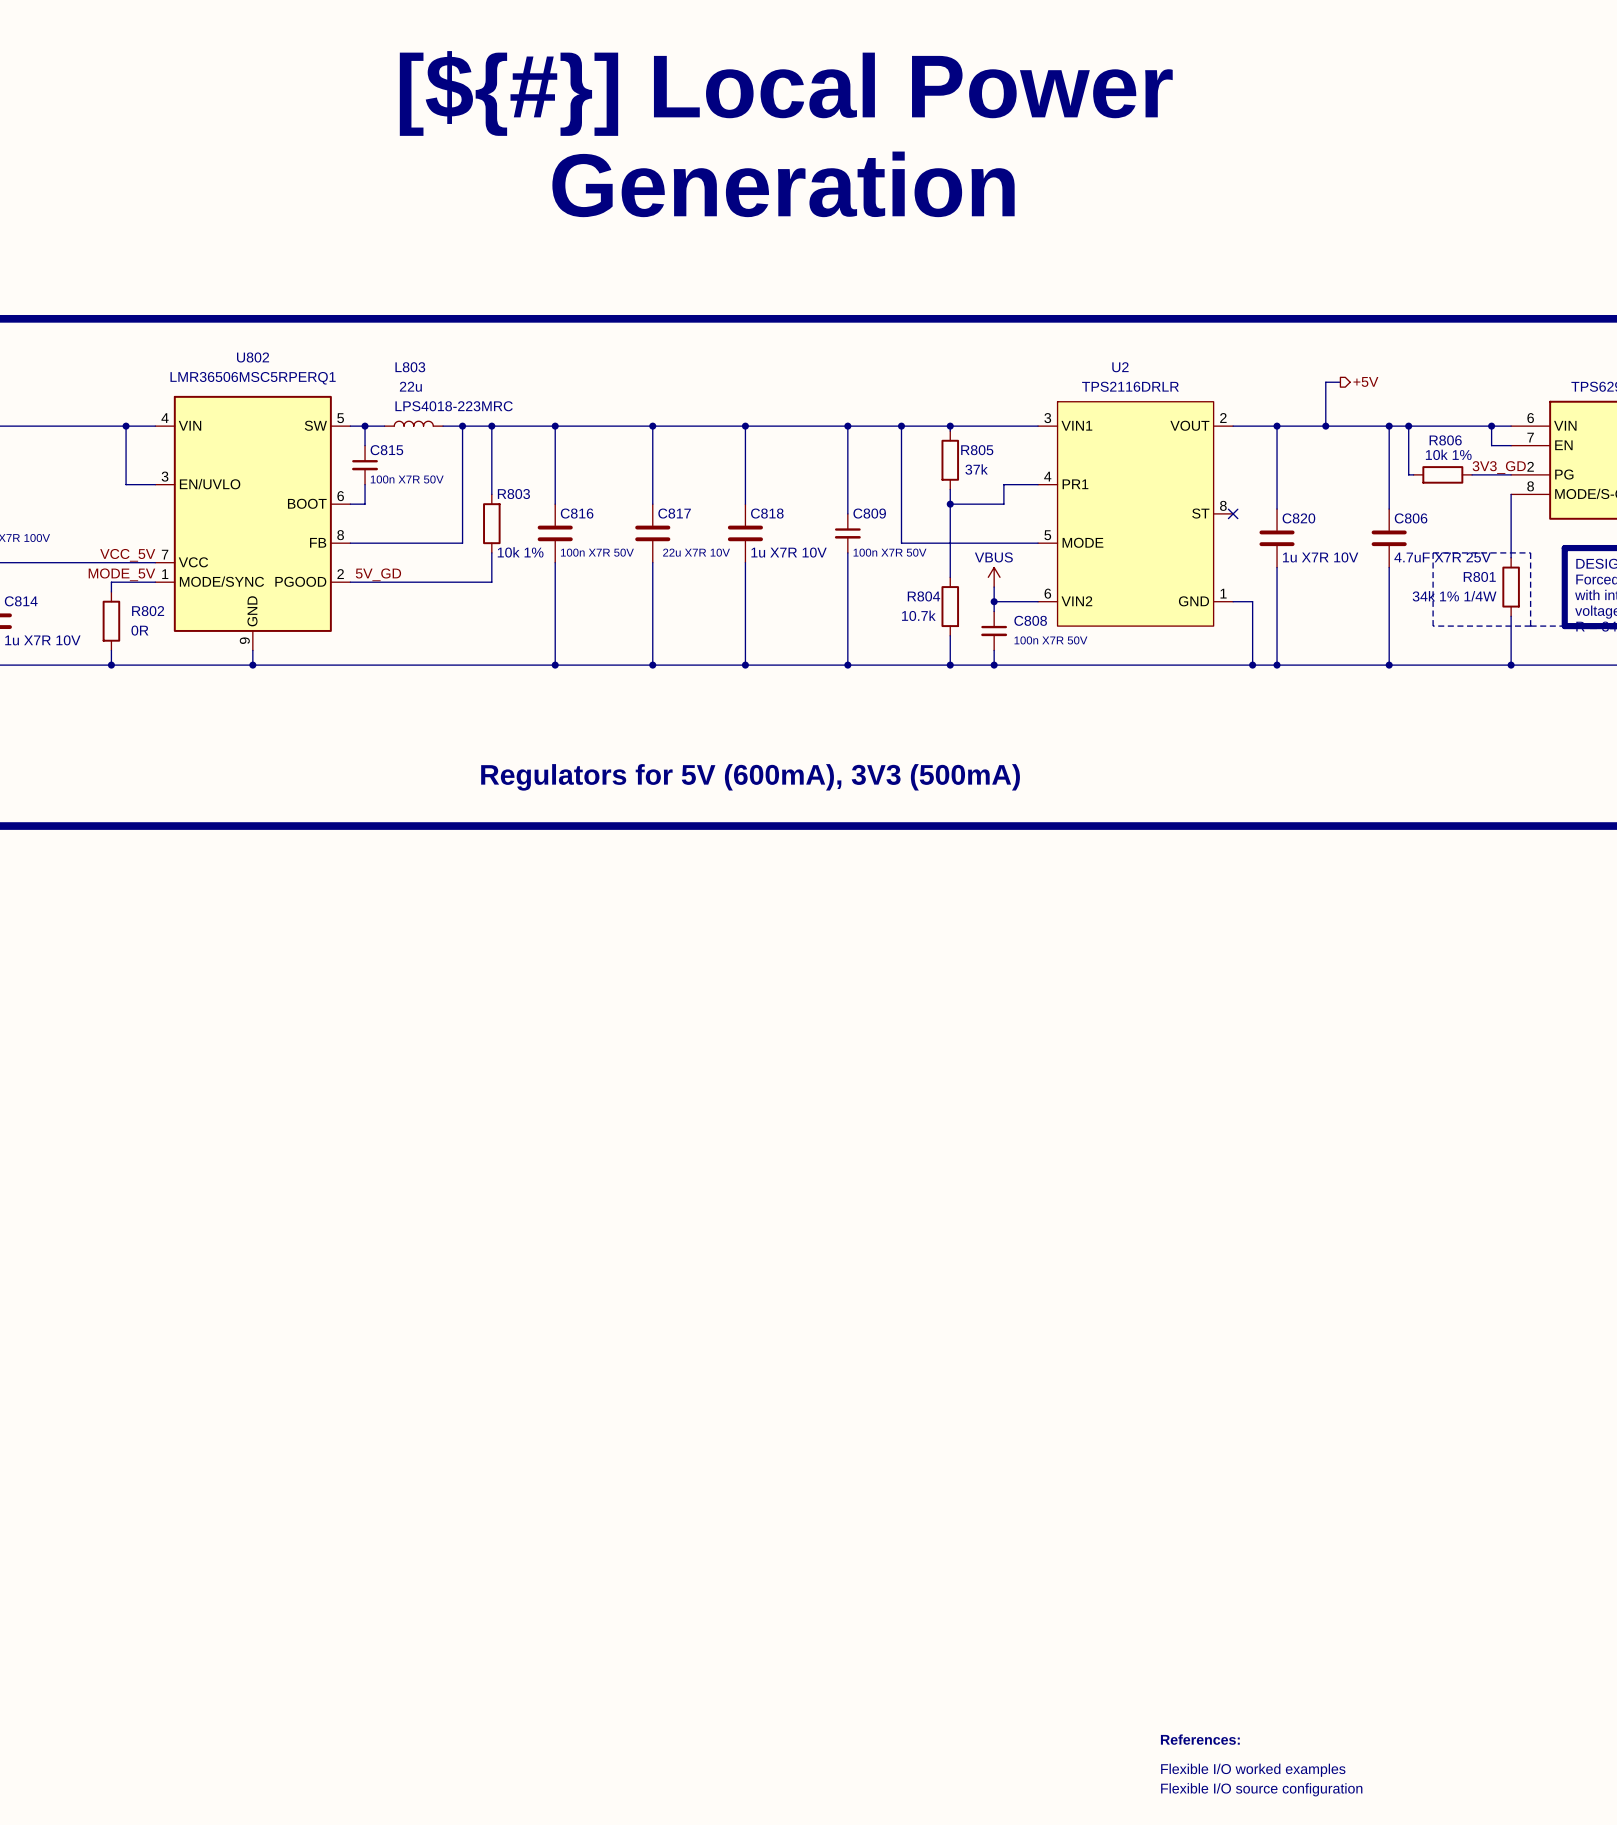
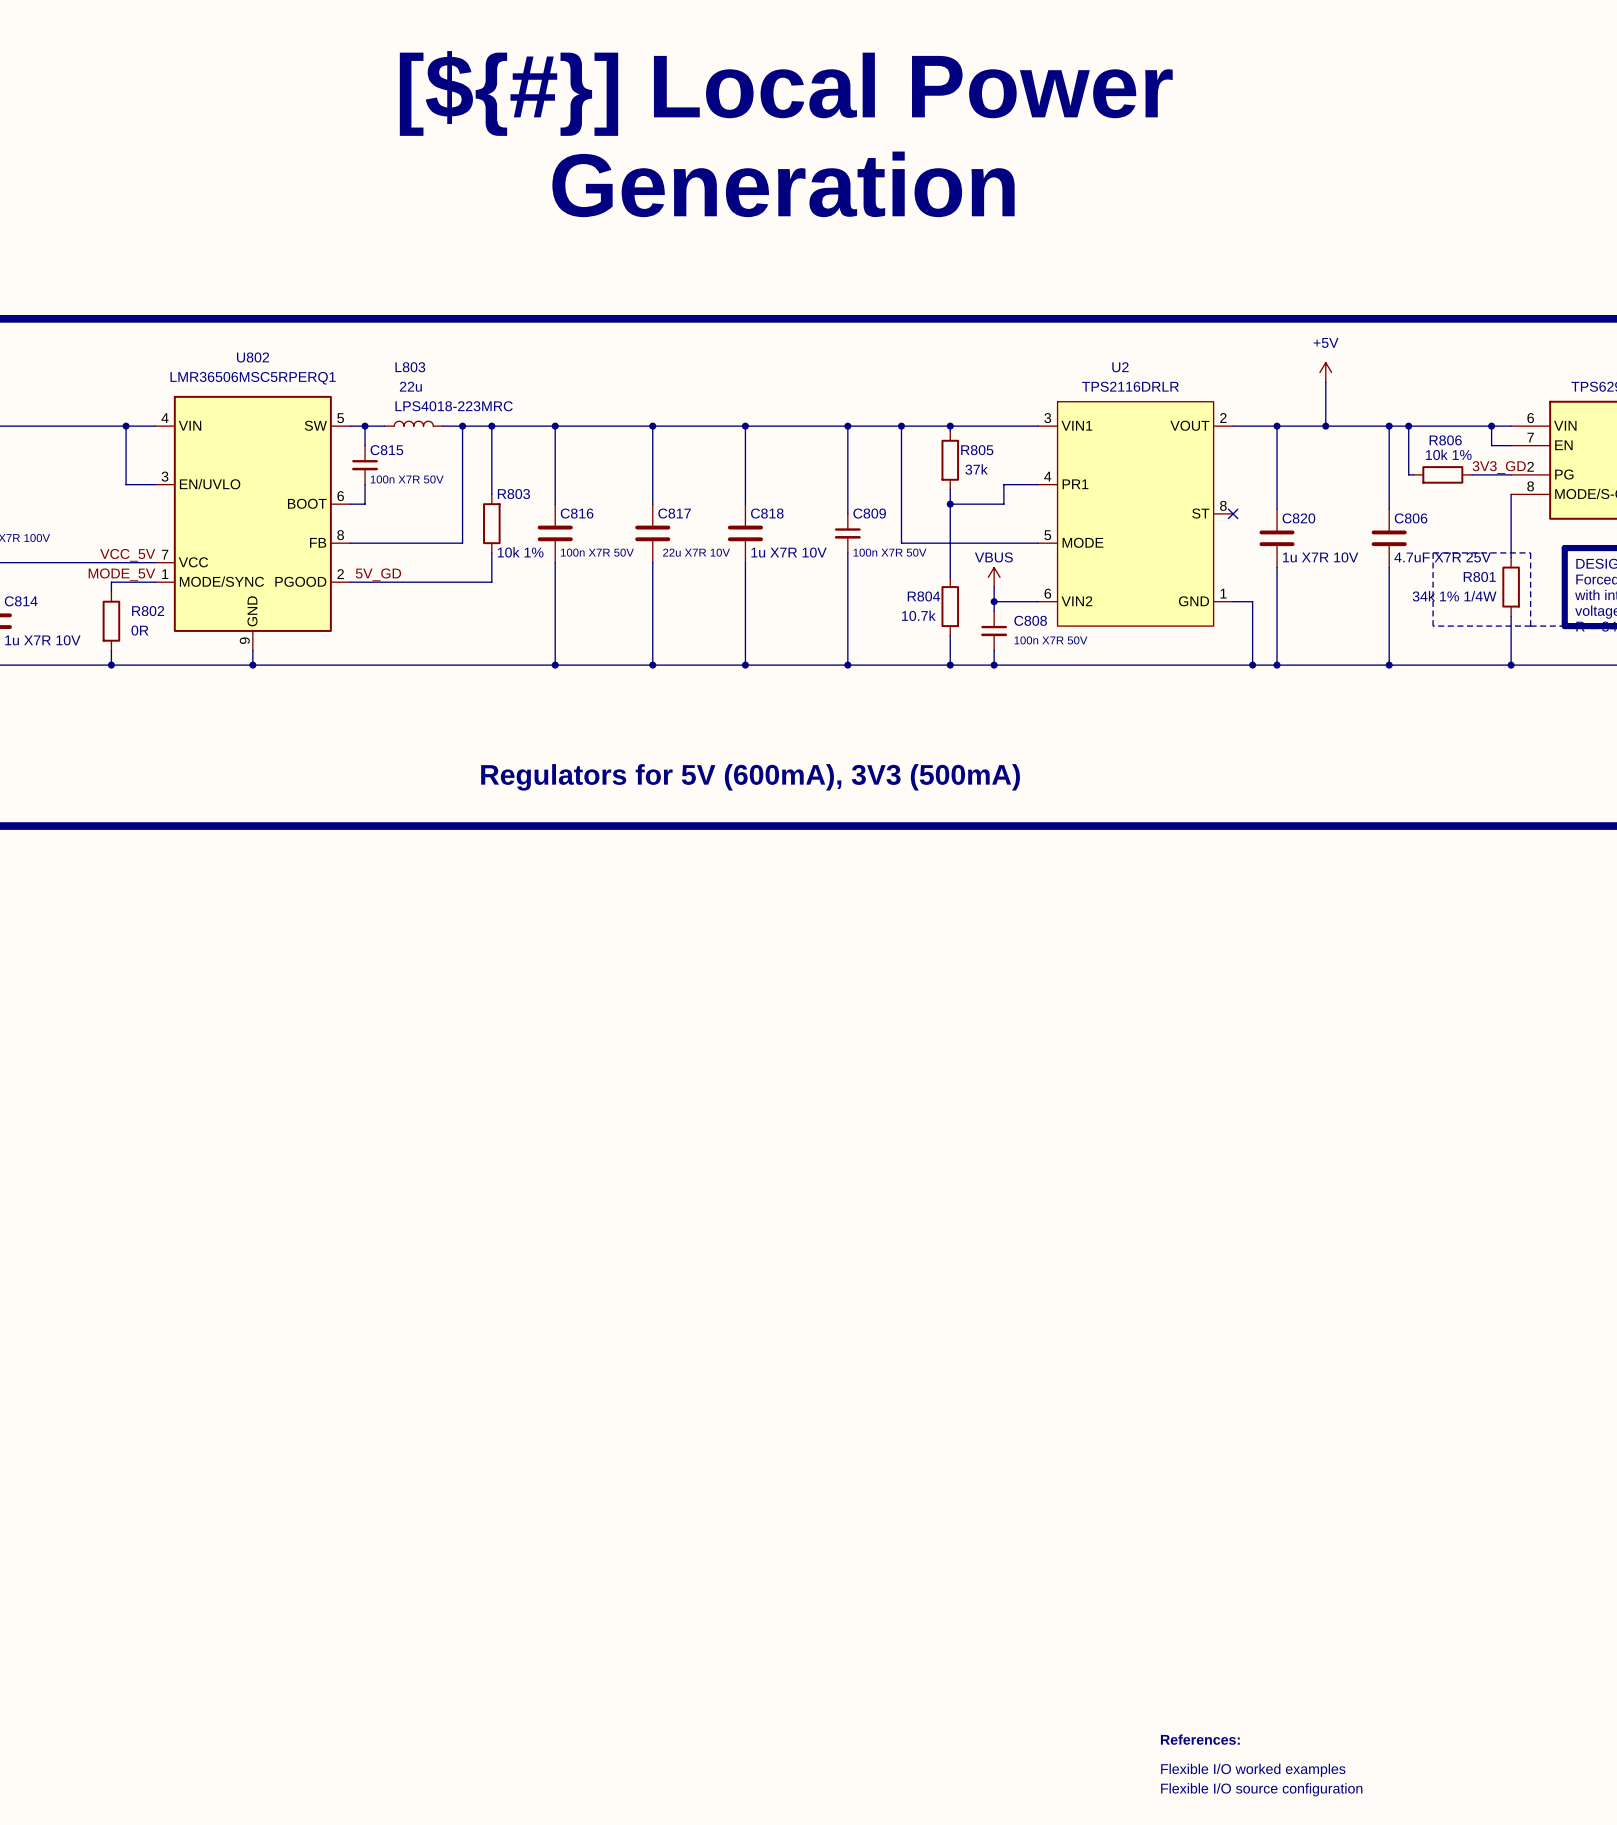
power symbol: none -> +5V (1325, 372)
hierarchical label: +5V (1365, 381) -> none
wire: (1325, 382) (1340, 382) -> none

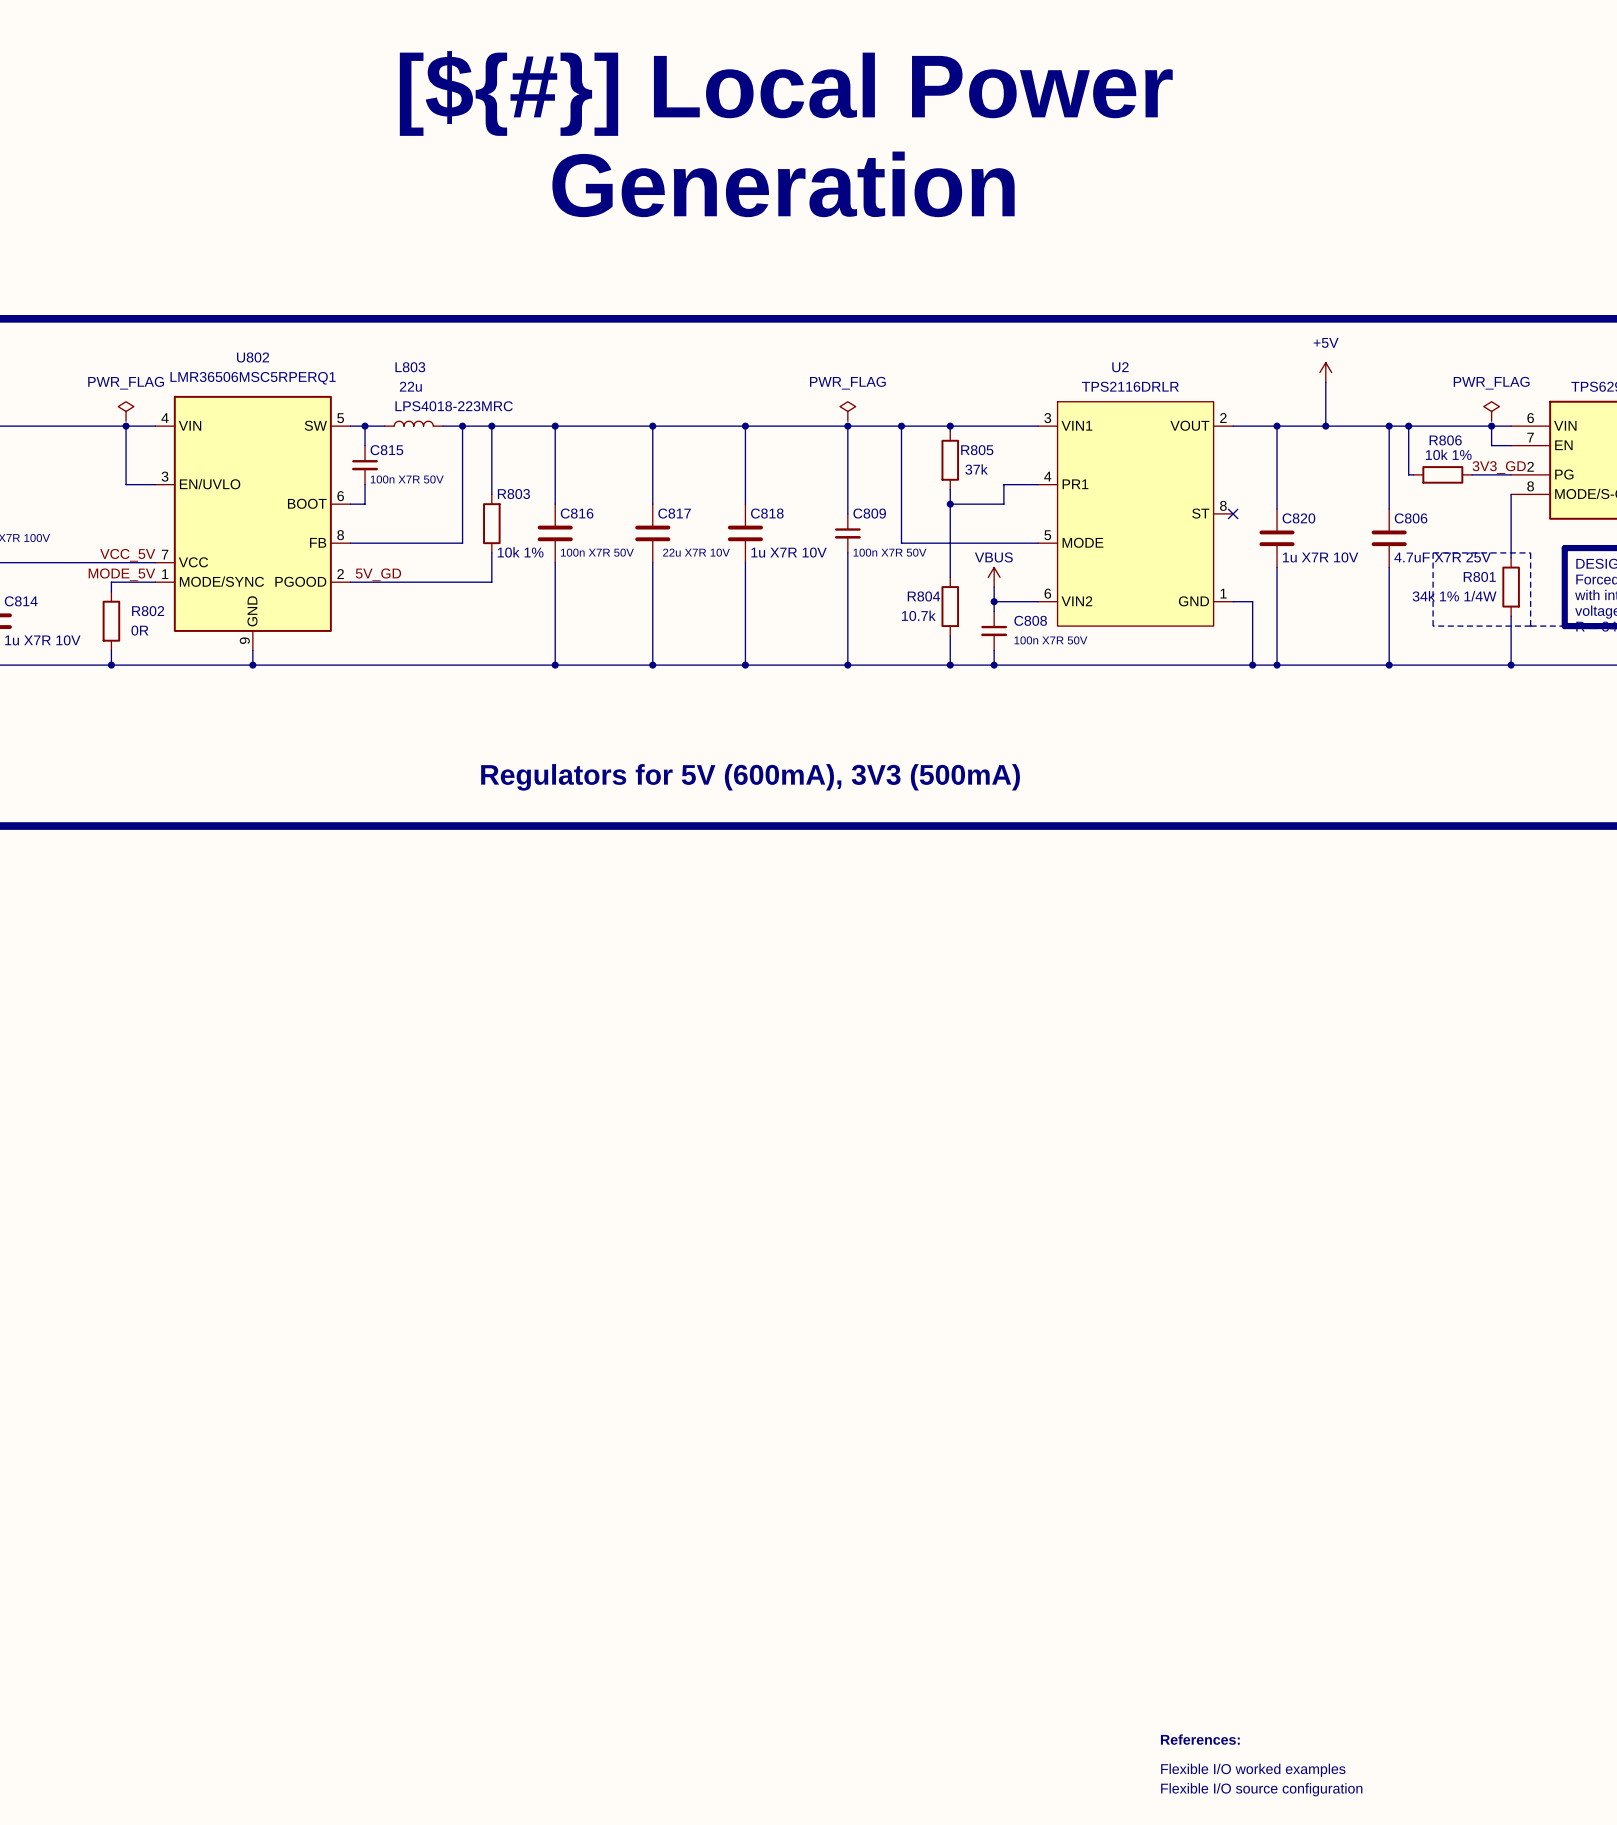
power symbol: none -> PWR_FLAG (126, 411)
power symbol: none -> PWR_FLAG (847, 411)
power symbol: none -> PWR_FLAG (1491, 411)

